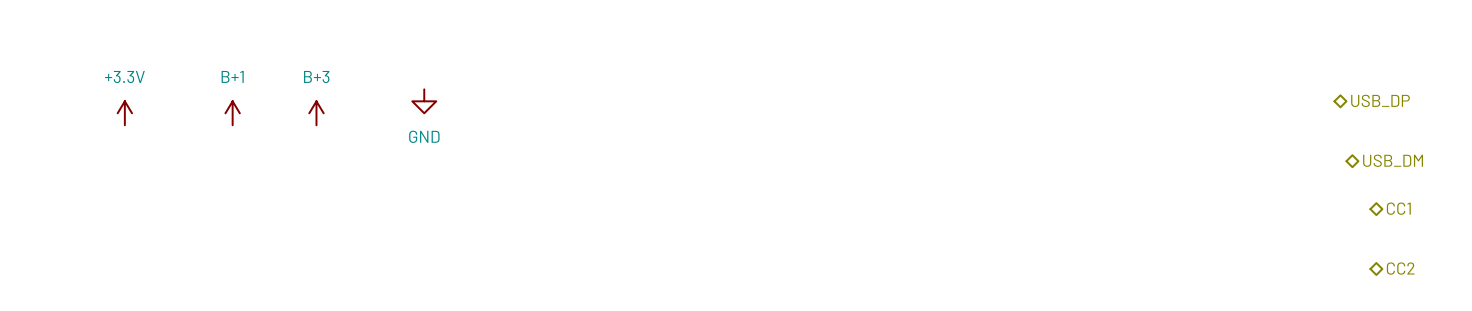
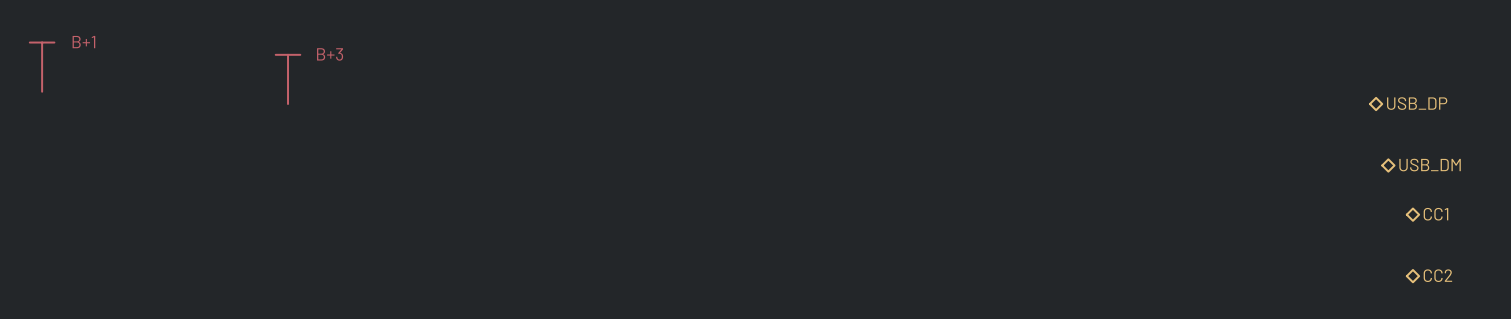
power symbol: none -> (42, 67)
power symbol: none -> (288, 79)
power symbol: GND (424, 101) -> none
power symbol: +3.3V (124, 113) -> none
power symbol: B+1 (232, 113) -> none
power symbol: B+3 (316, 113) -> none

